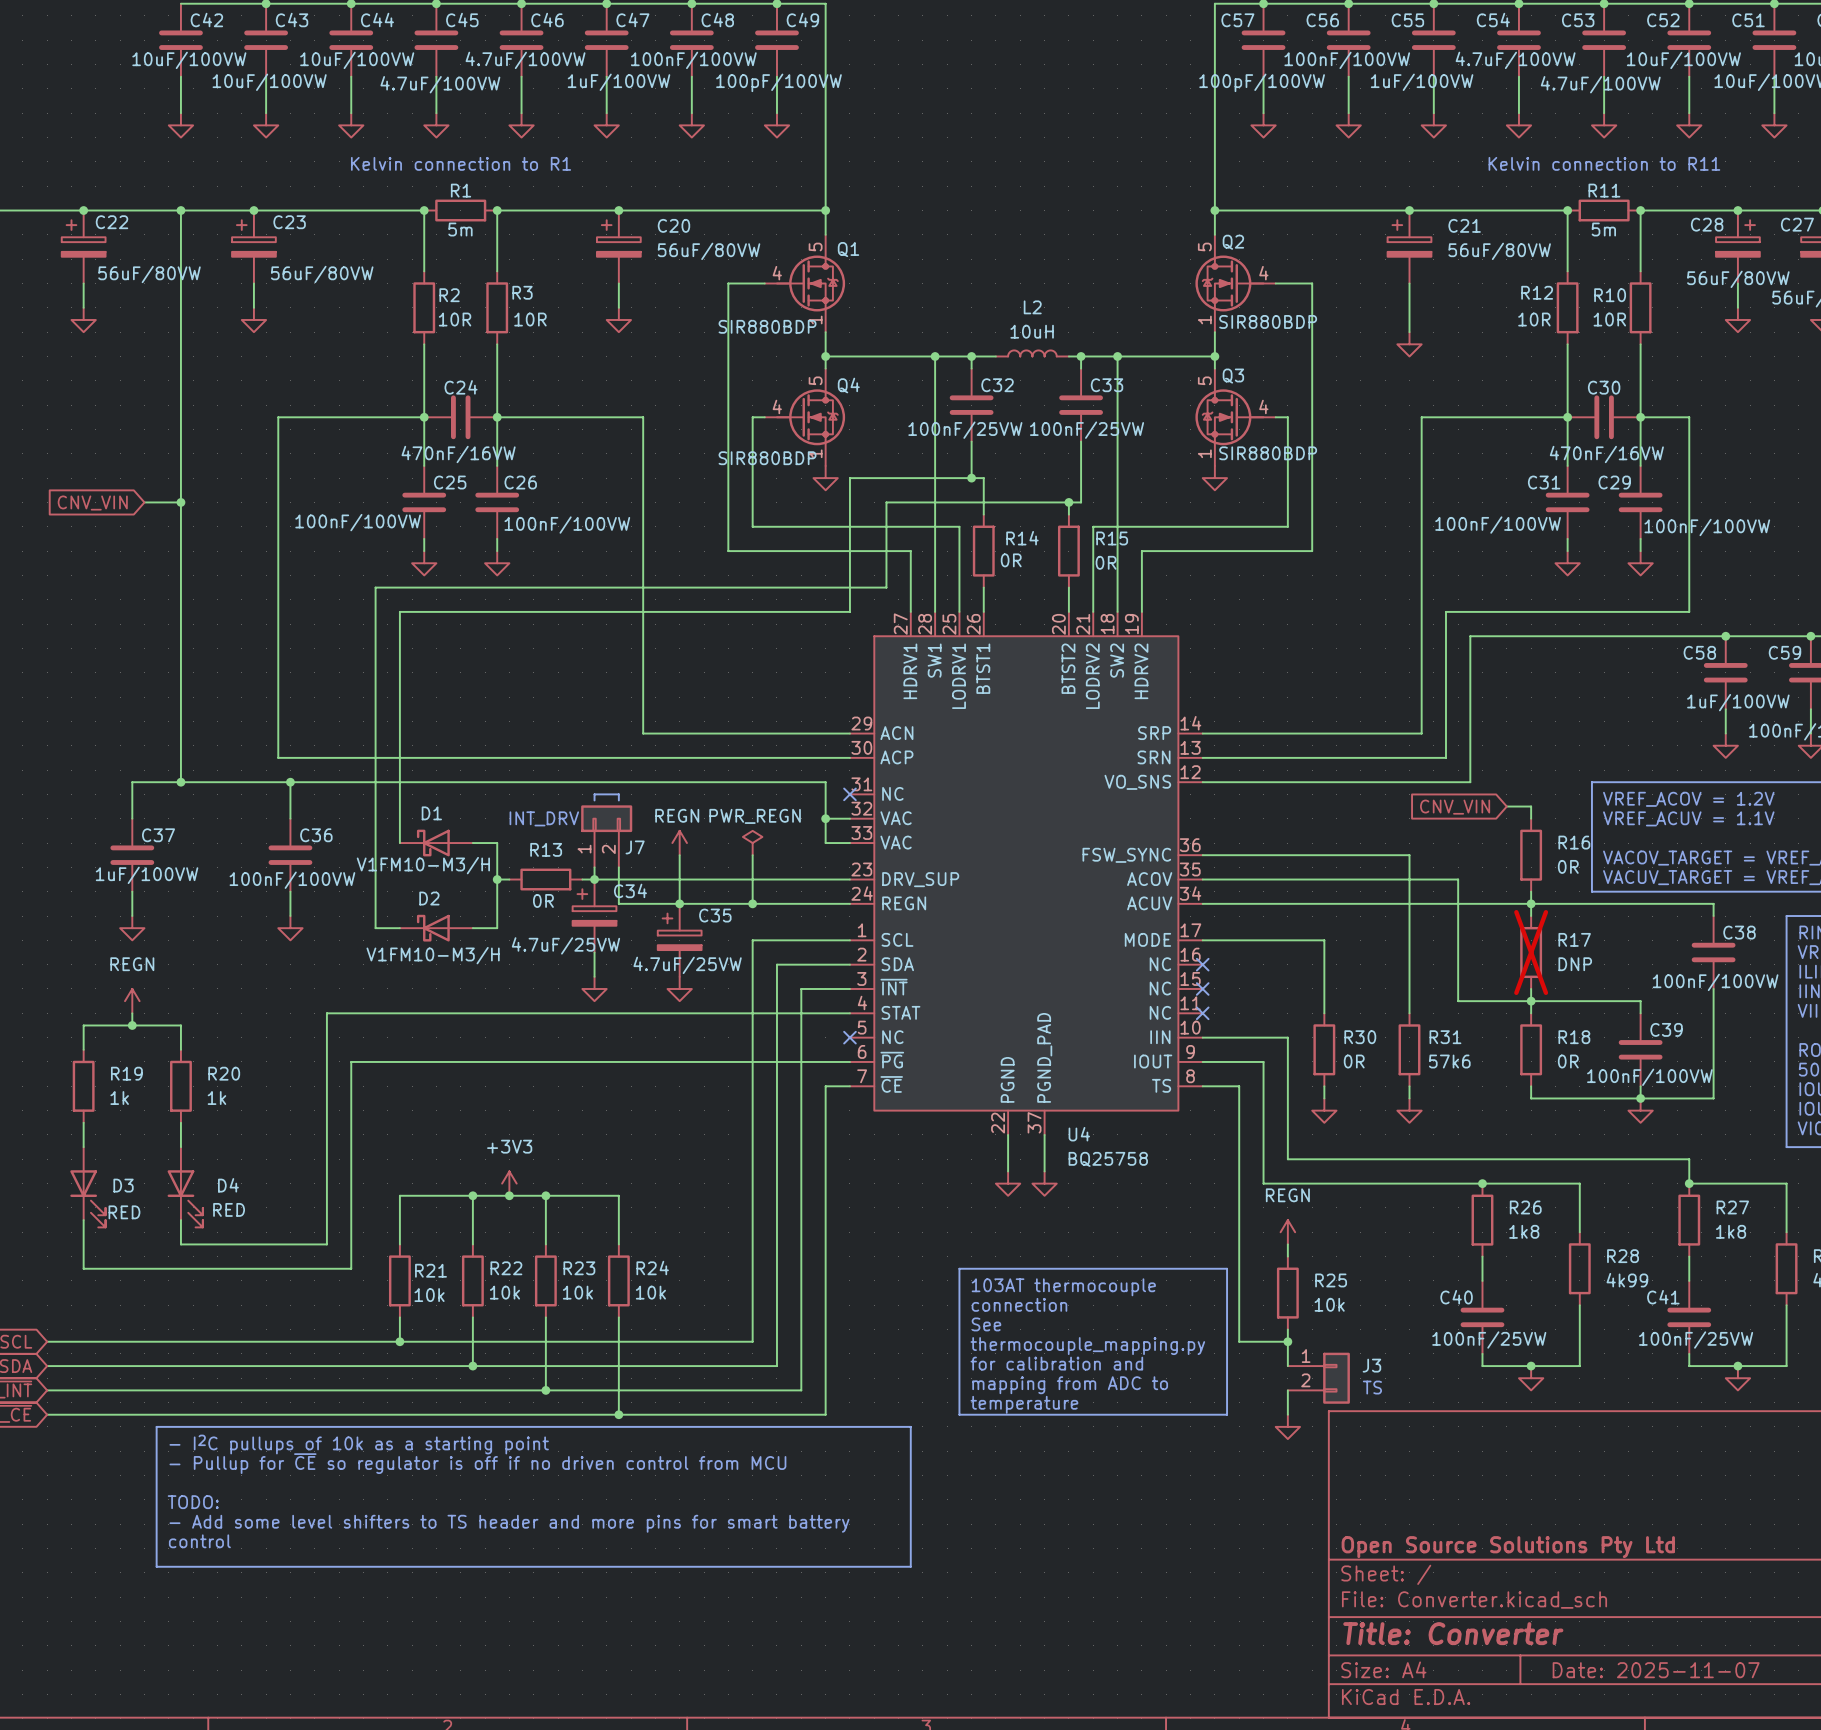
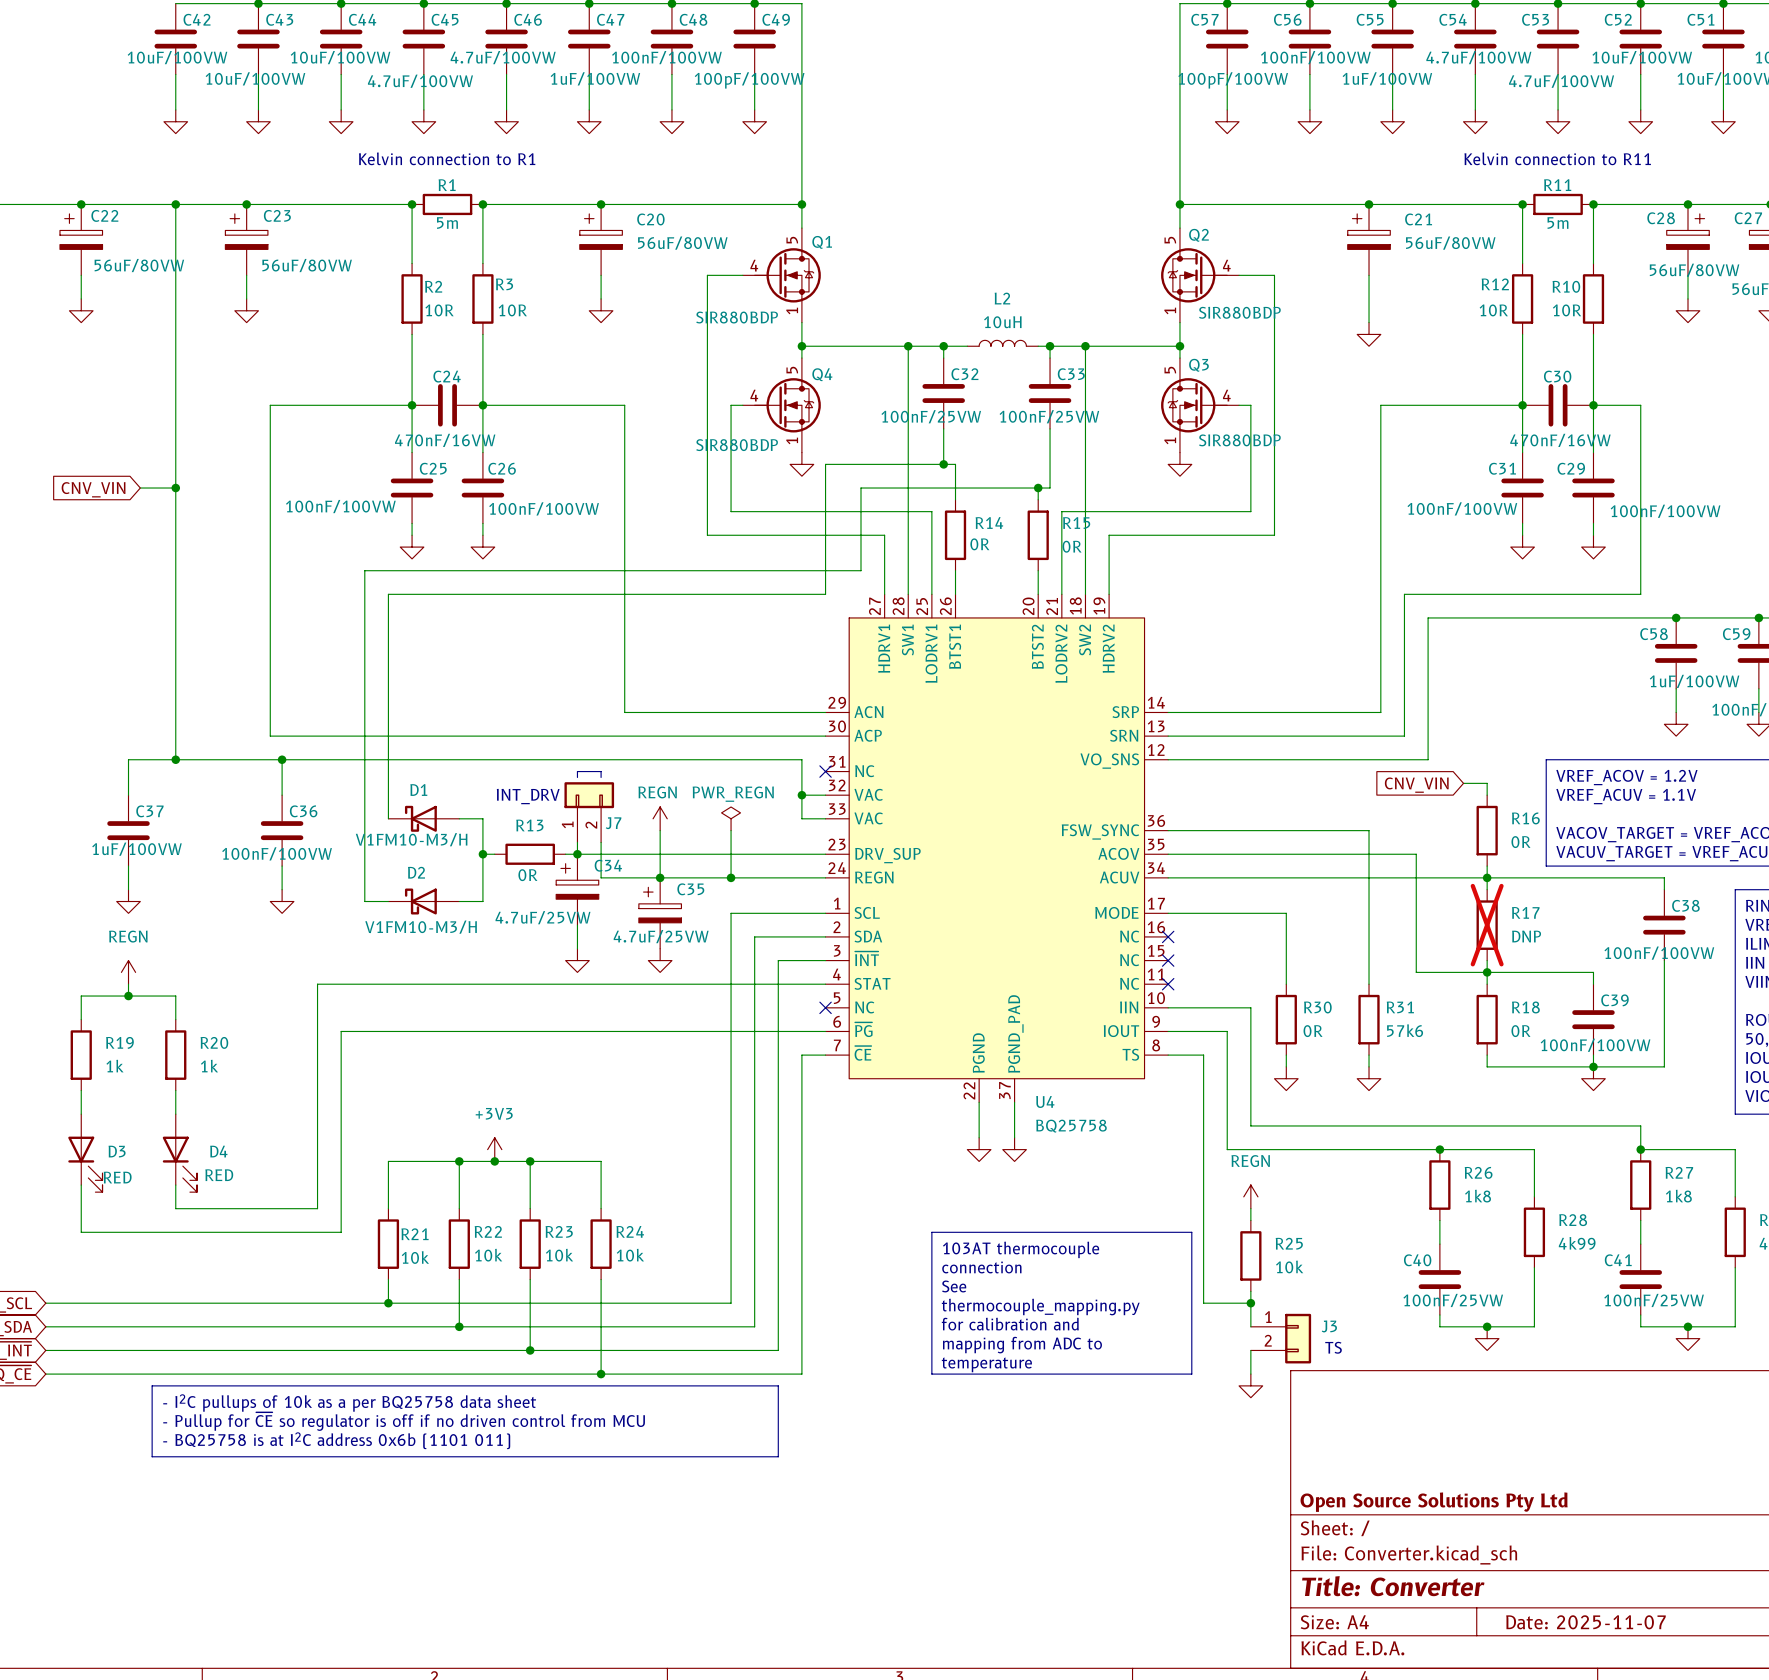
line: (801, 1426) (910, 1426) (910, 1566) (156, 1566) (156, 1499) -> (778, 1385) (778, 1456) (152, 1456)
text: - I2C pullups of 10k as a starting point (359, 1444) -> - I2C pullups of 10k as a per BQ25758 data sheet (349, 1403)
text: none -> - BQ25758 is at I2C address 0x6b (1101 011) (336, 1440)
text: TODO: (193, 1502) -> none
text: - Add some level shifters to TS header and more pins for smart battery (509, 1523) -> none
text: control (199, 1541) -> none

